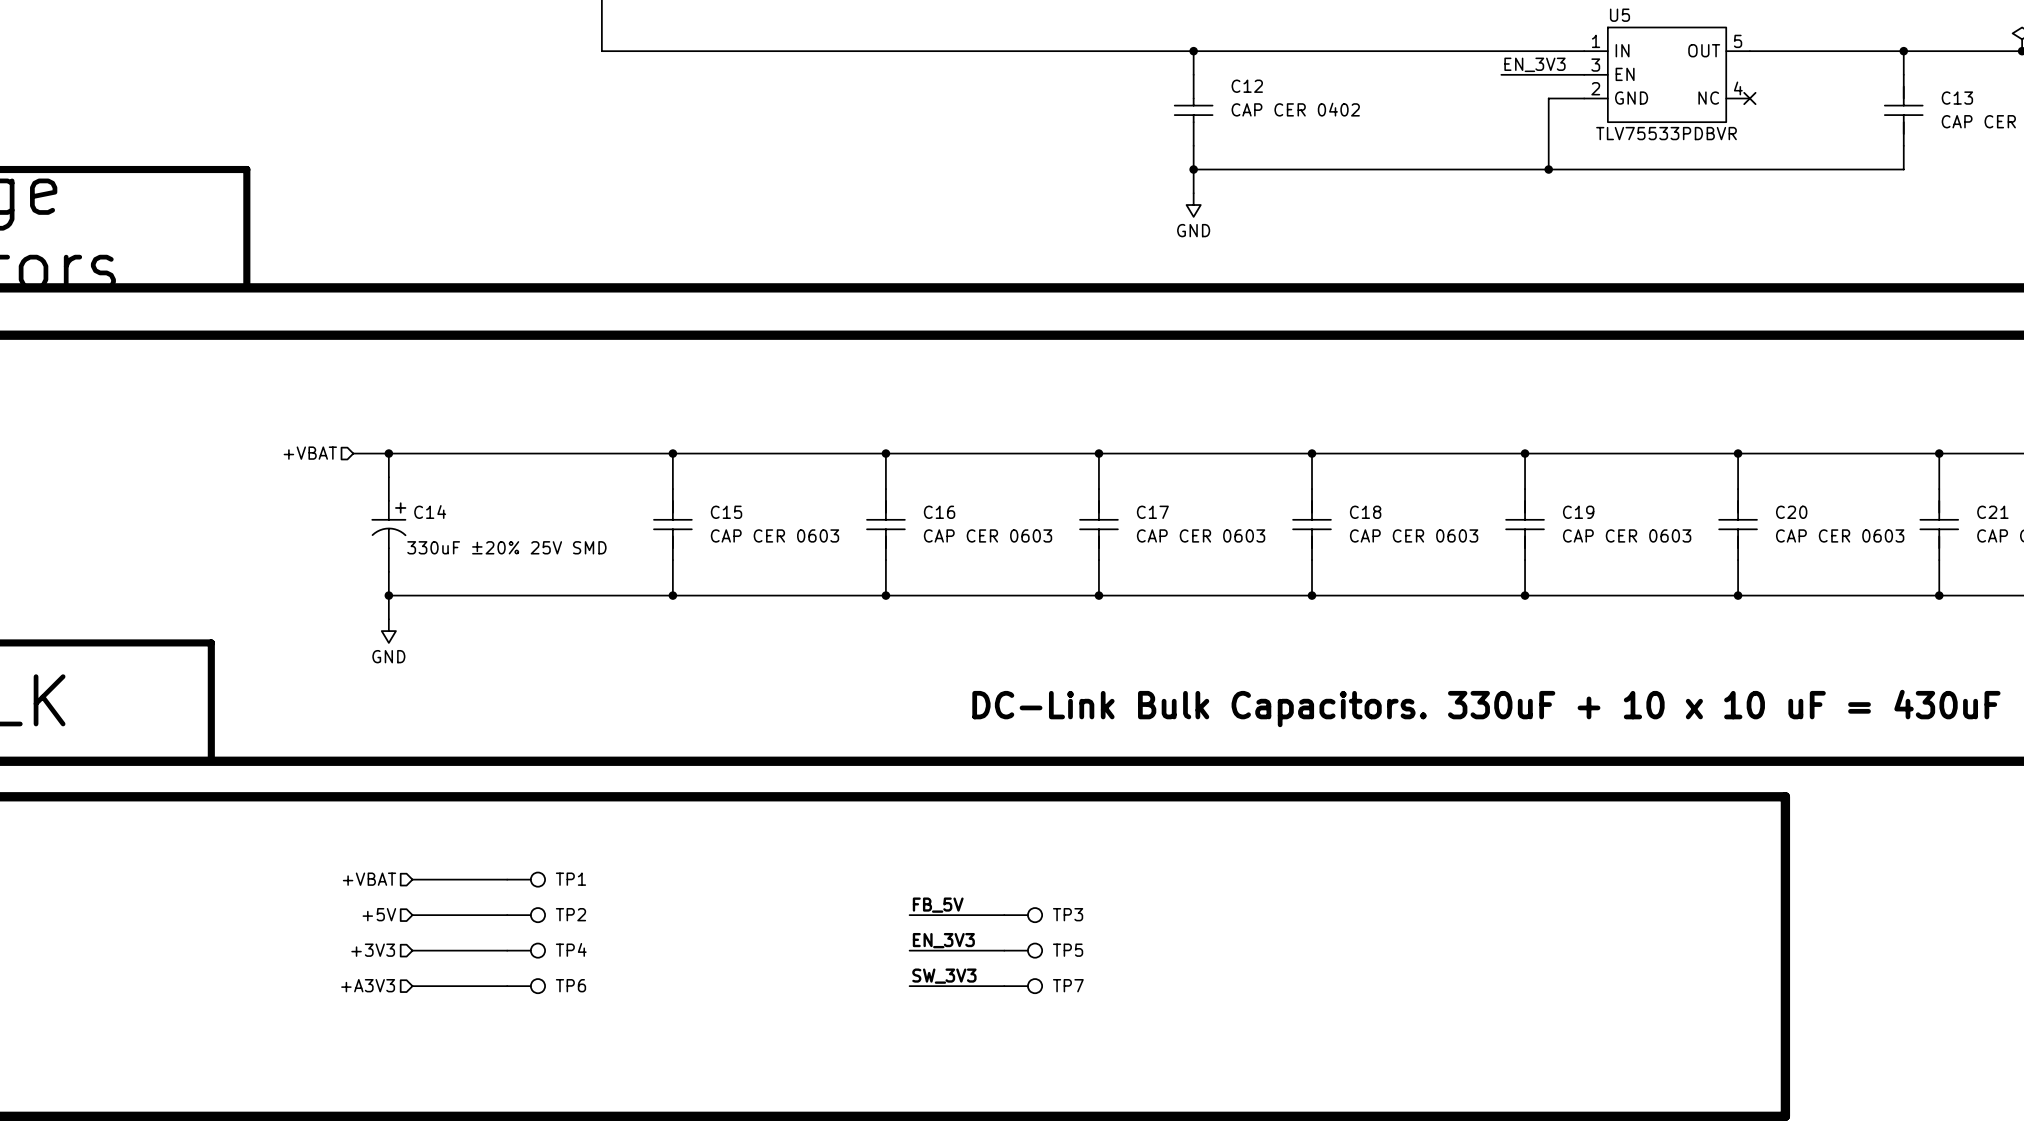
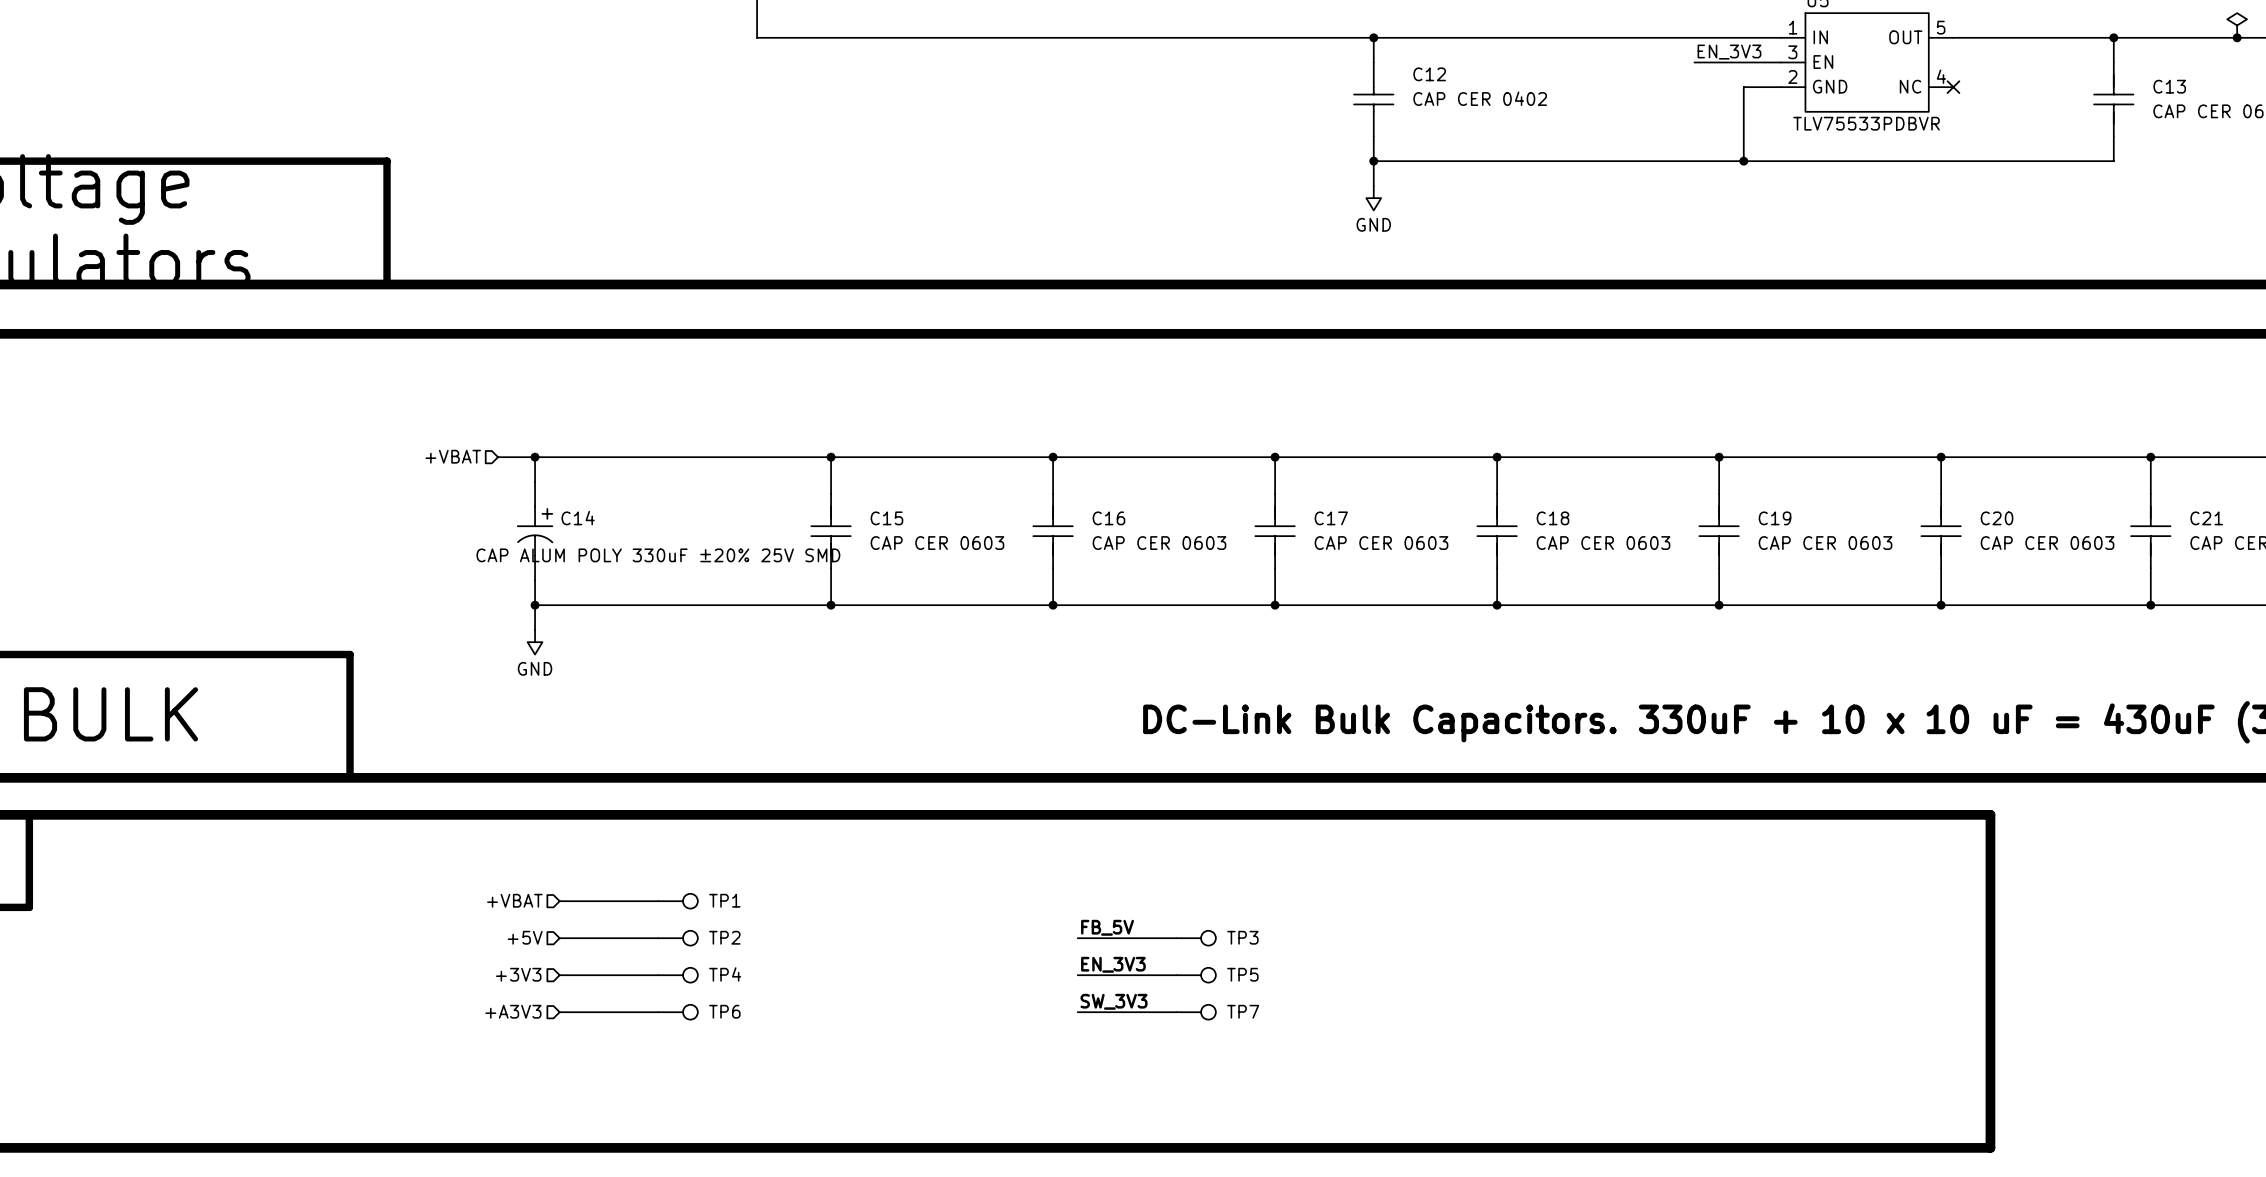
C14 text: 330uF ±20% 25V SMD (506, 547) -> CAP ALUM POLY 330uF ±20% 25V SMD (658, 555)

